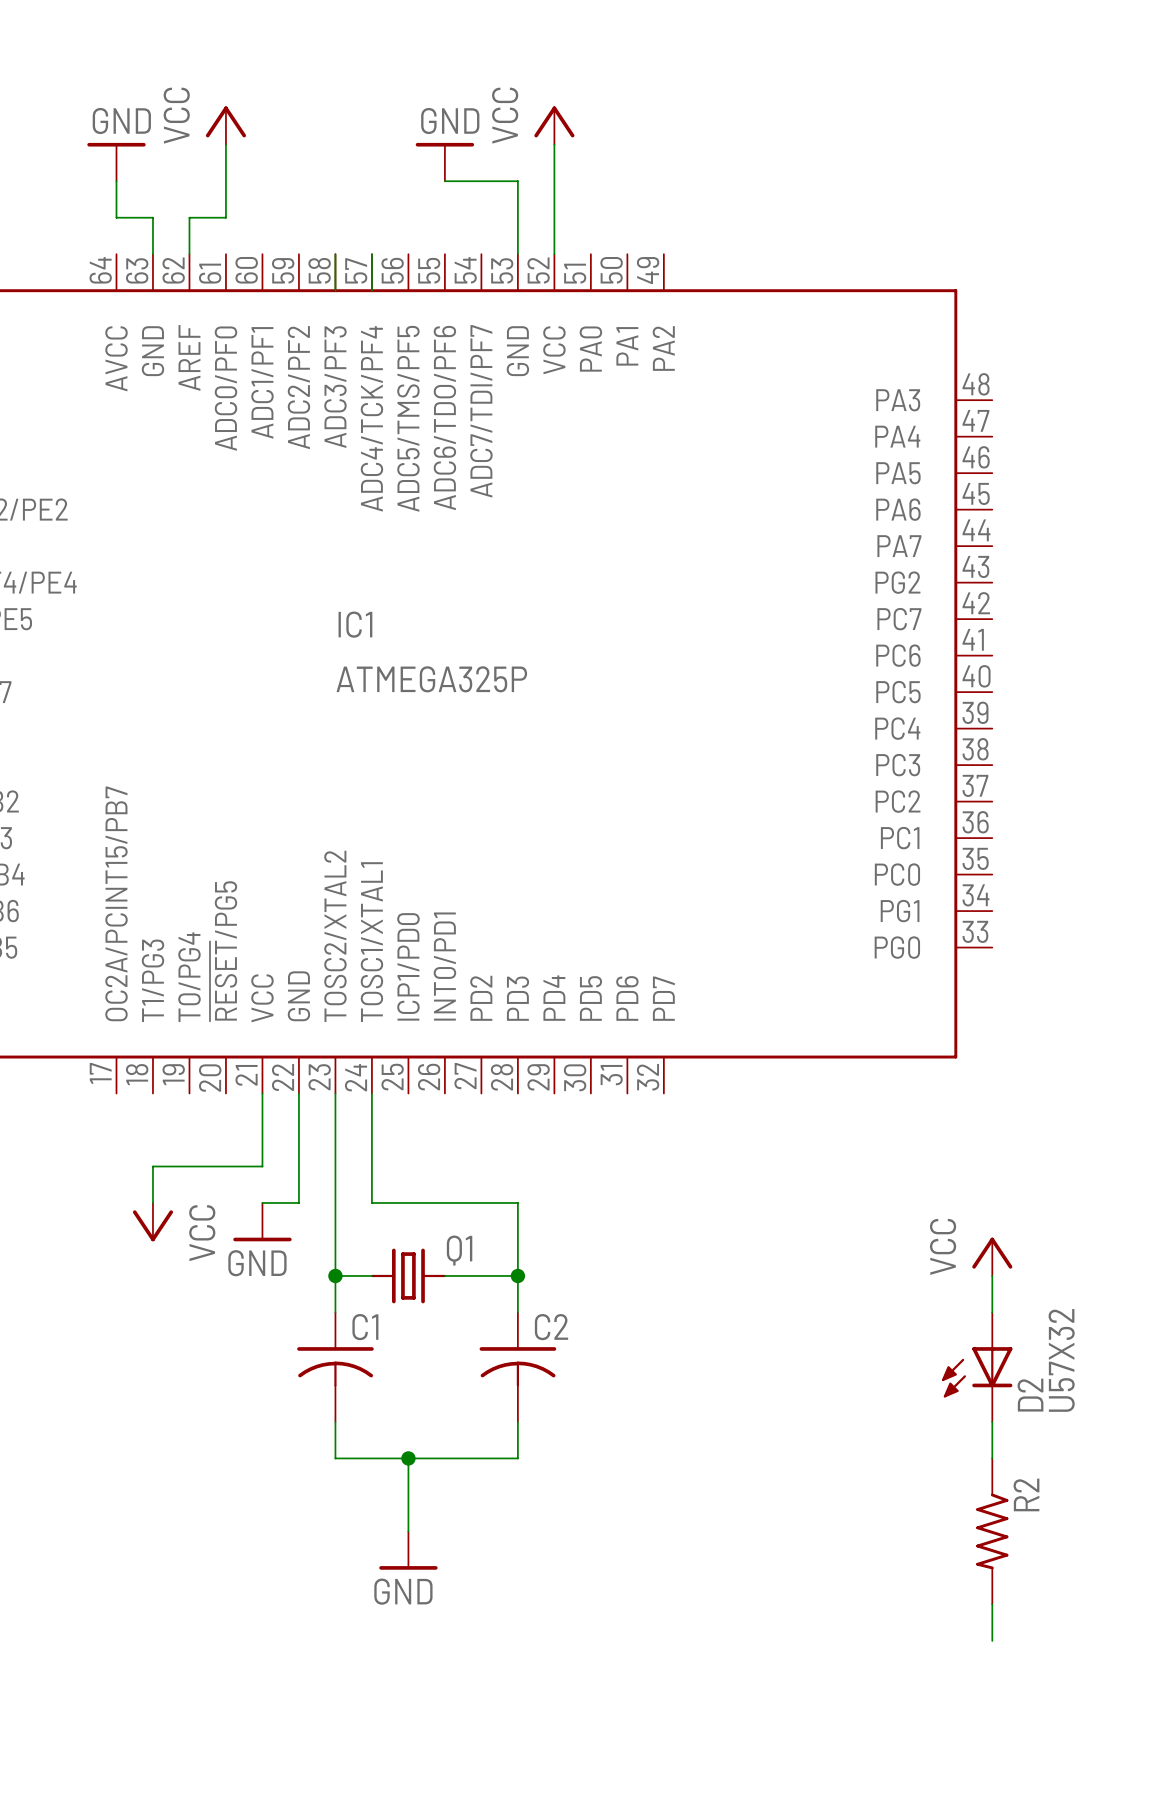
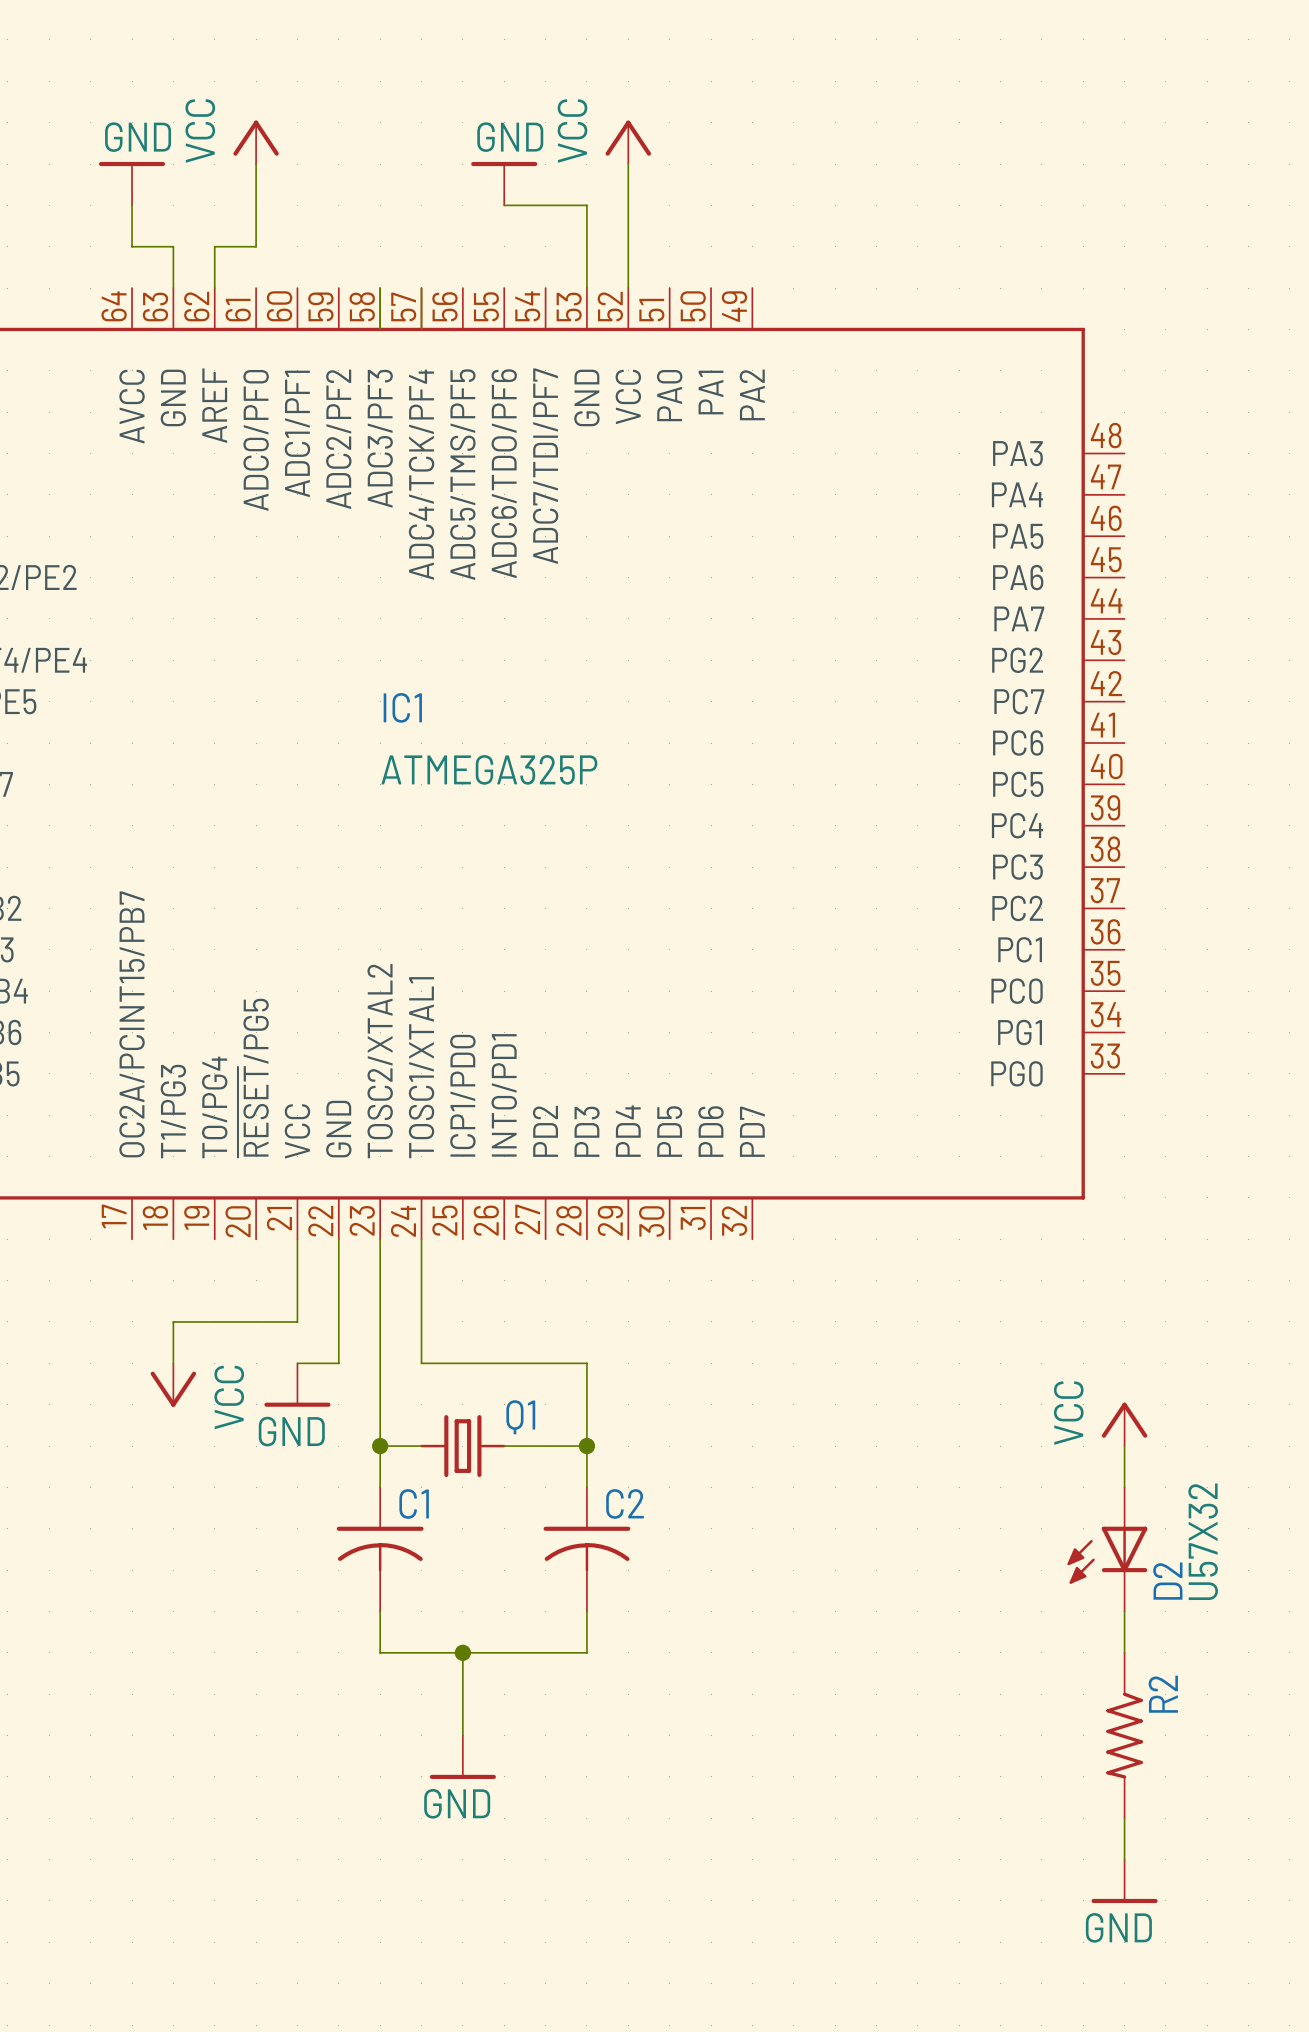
power symbol: none -> GND (1124, 1881)

